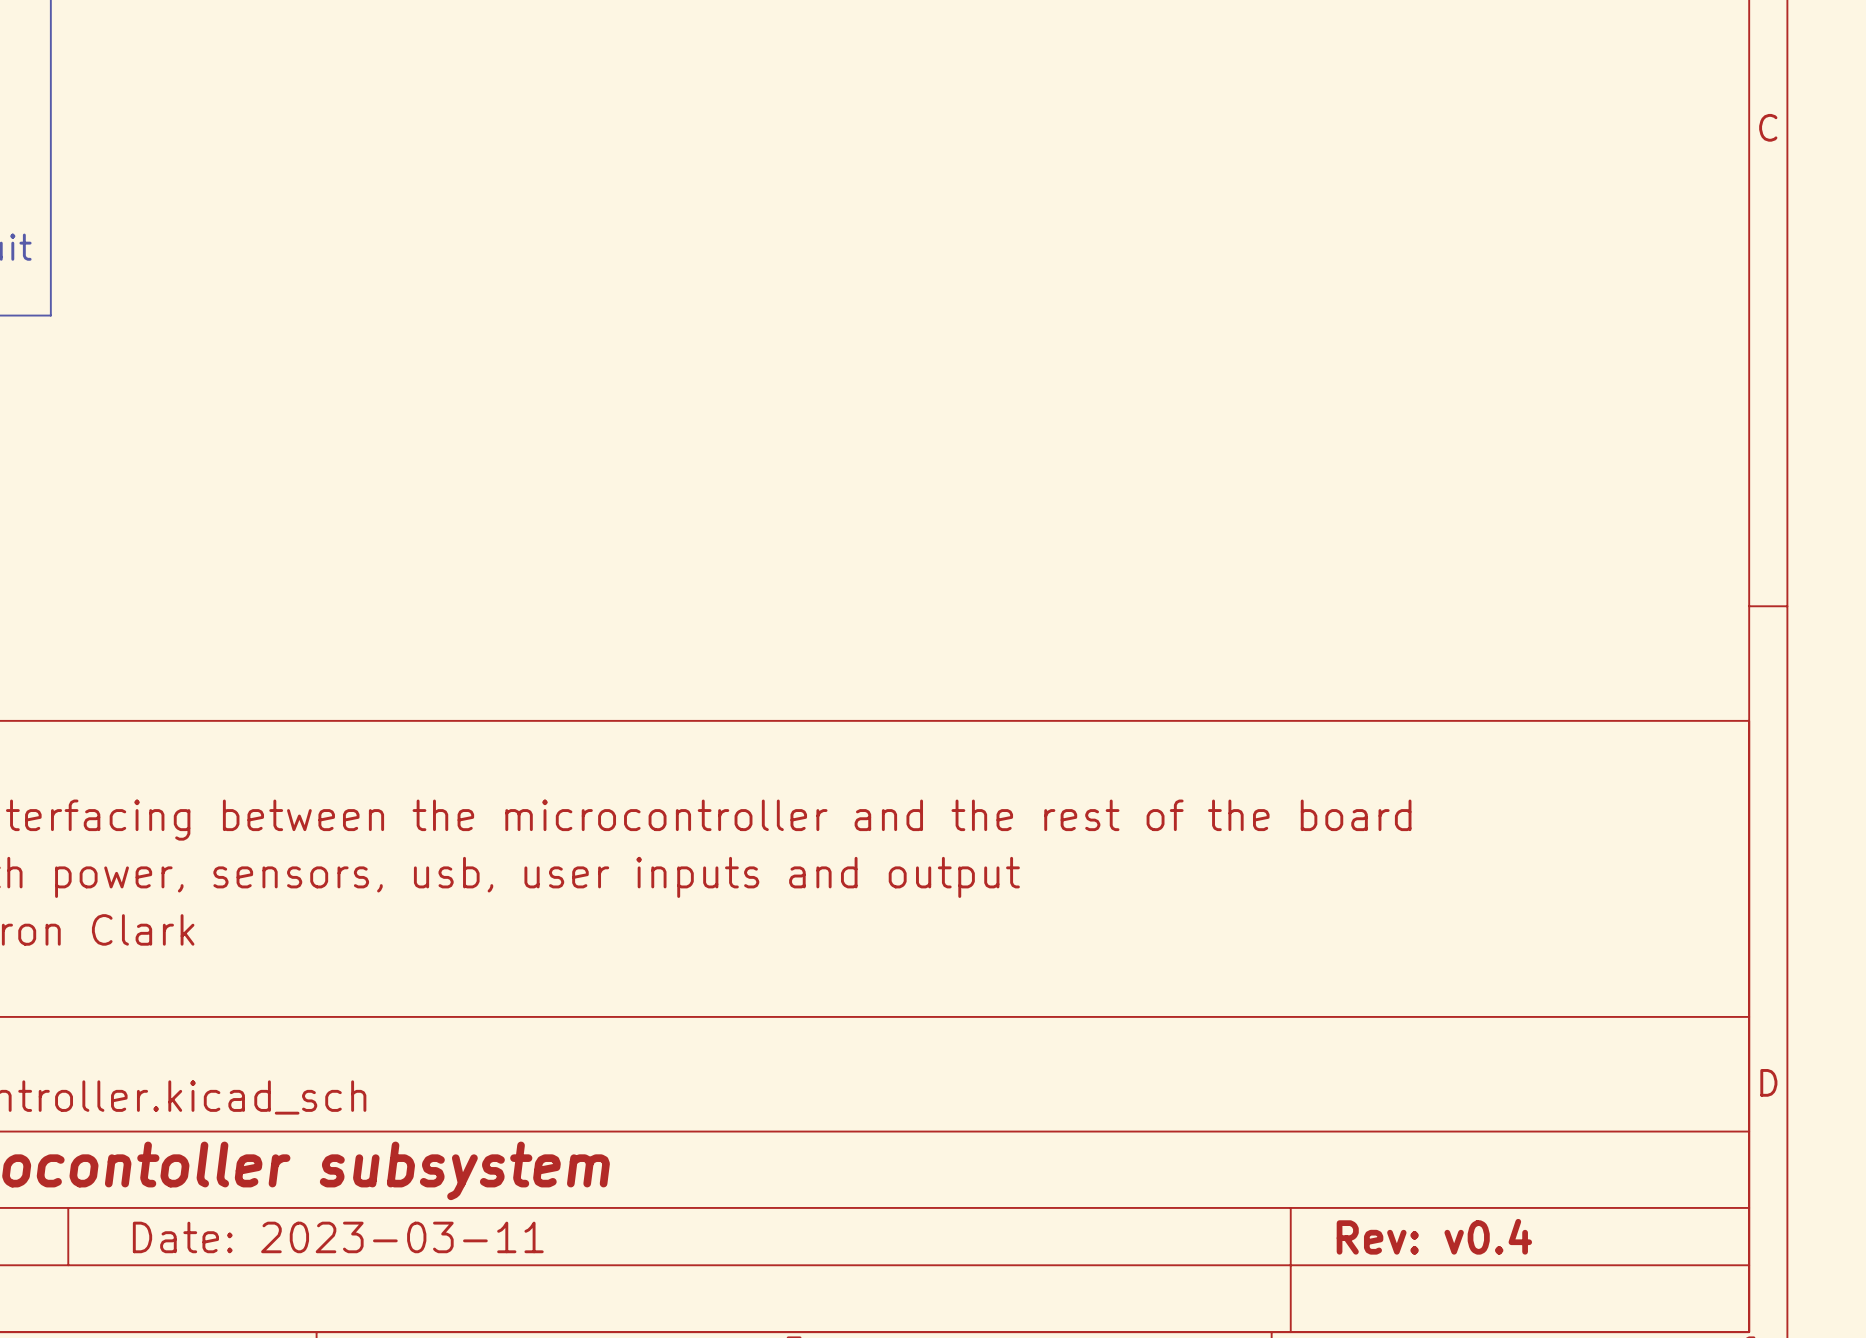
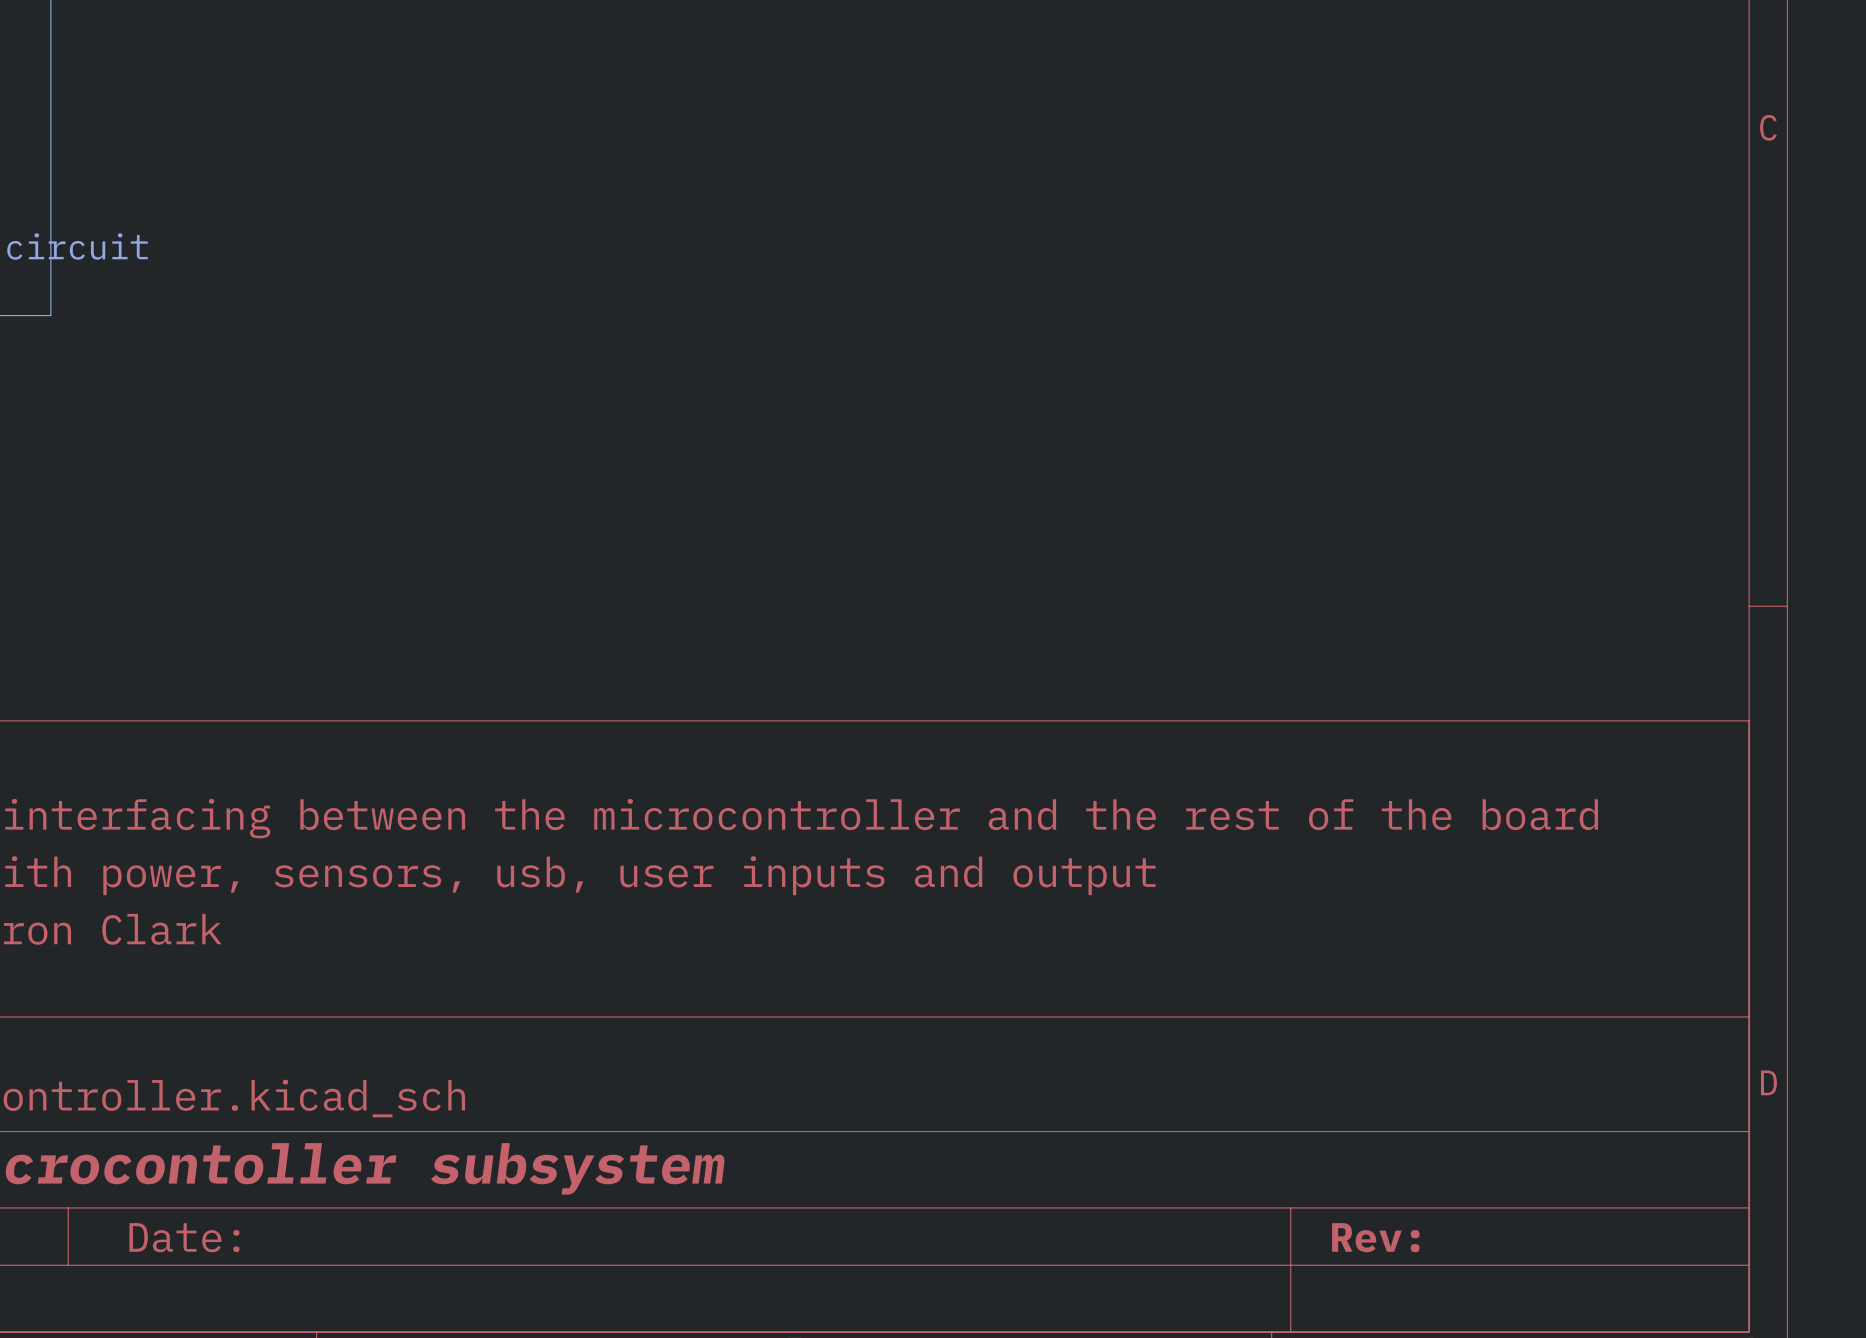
title block: Rev: v0.4 (1434, 1236) -> Rev: (1375, 1237)
title block: Date: 2023-03-11 (338, 1237) -> Date: (184, 1237)

